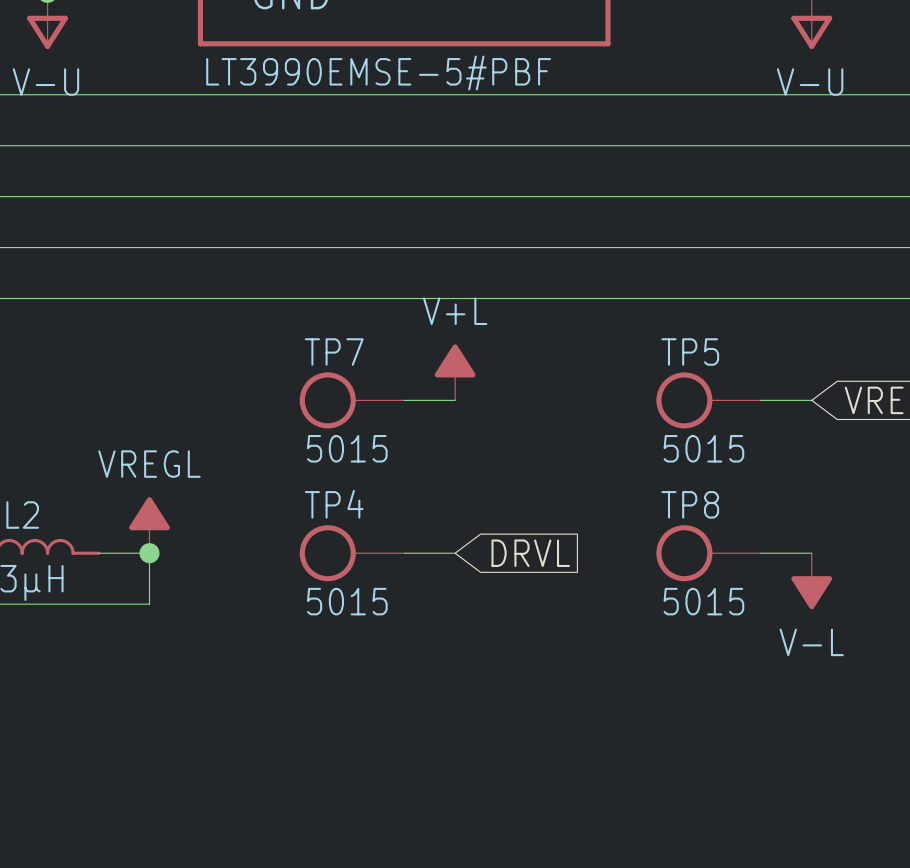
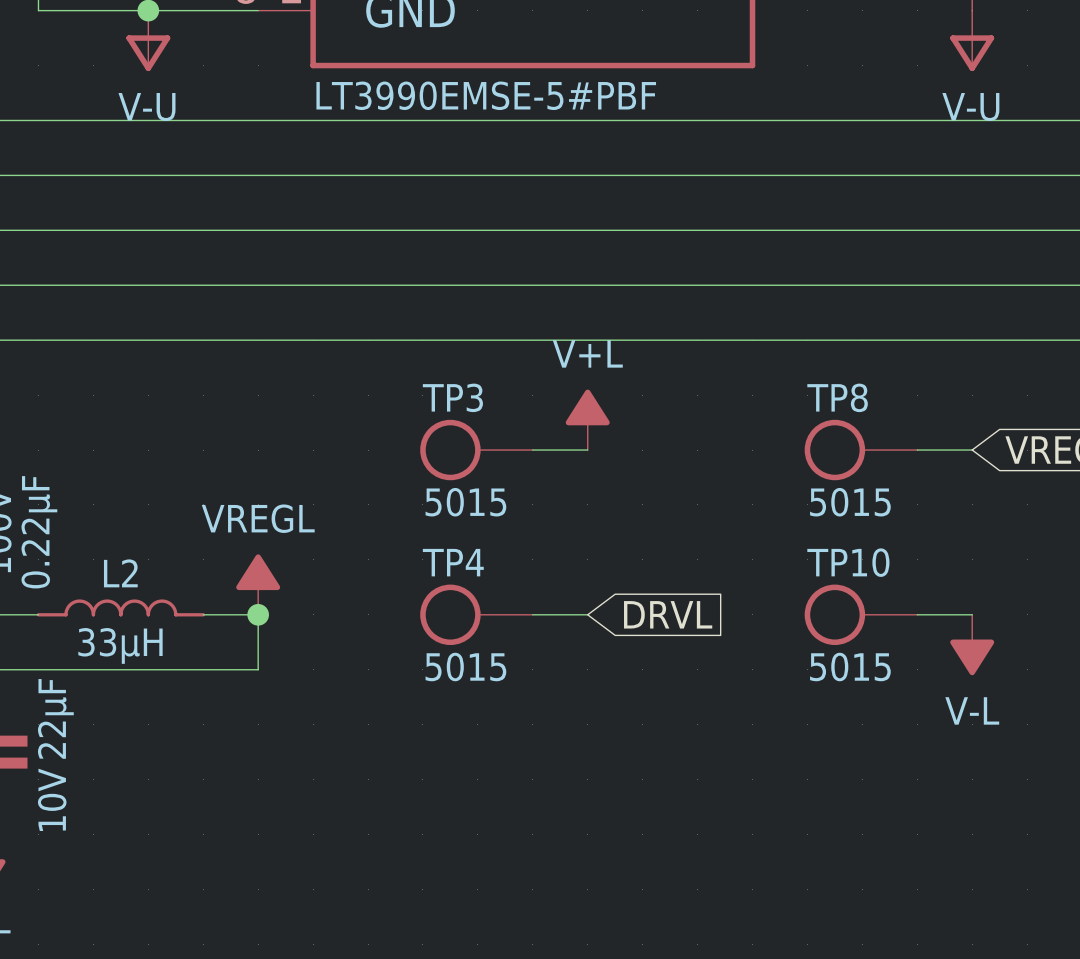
TP7 name: TP7 (334, 351) -> TP3 (452, 397)
TP5 name: TP5 (690, 351) -> TP8 (837, 397)
TP8 name: TP8 (690, 504) -> TP10 (848, 562)

